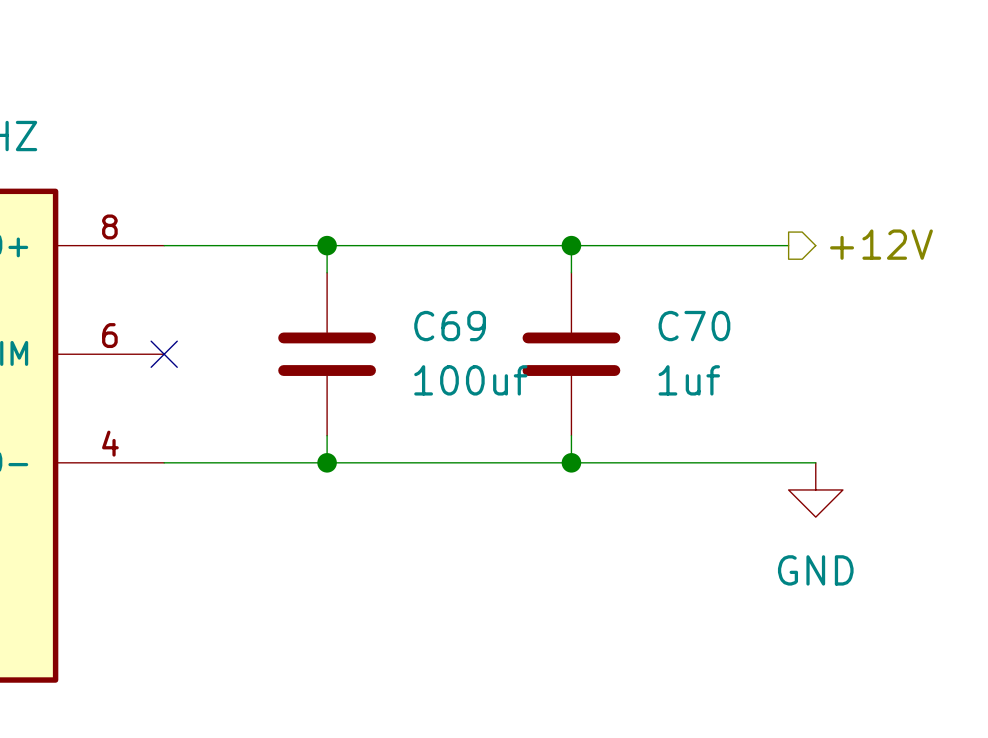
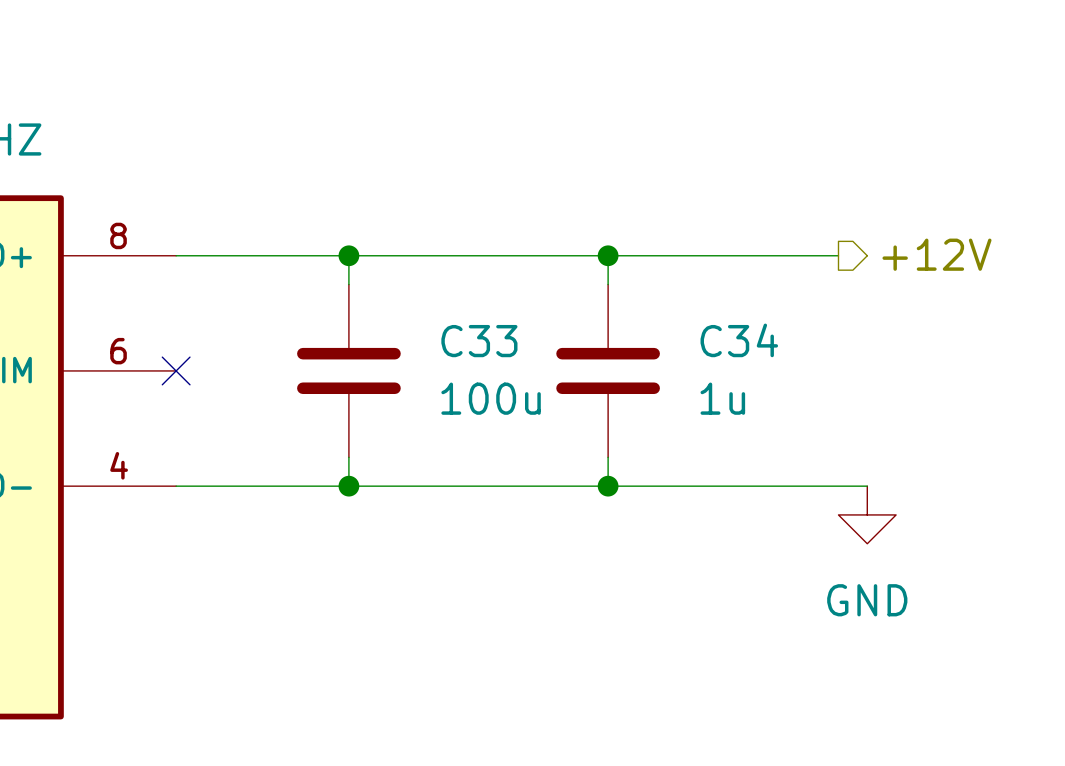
C69 name: C69 (450, 326) -> C33 (479, 341)
C70 name: C70 (694, 326) -> C34 (739, 340)
C69 value: 100uf (470, 380) -> 100u (491, 398)
C70 value: 1uf (689, 380) -> 1u (722, 398)

